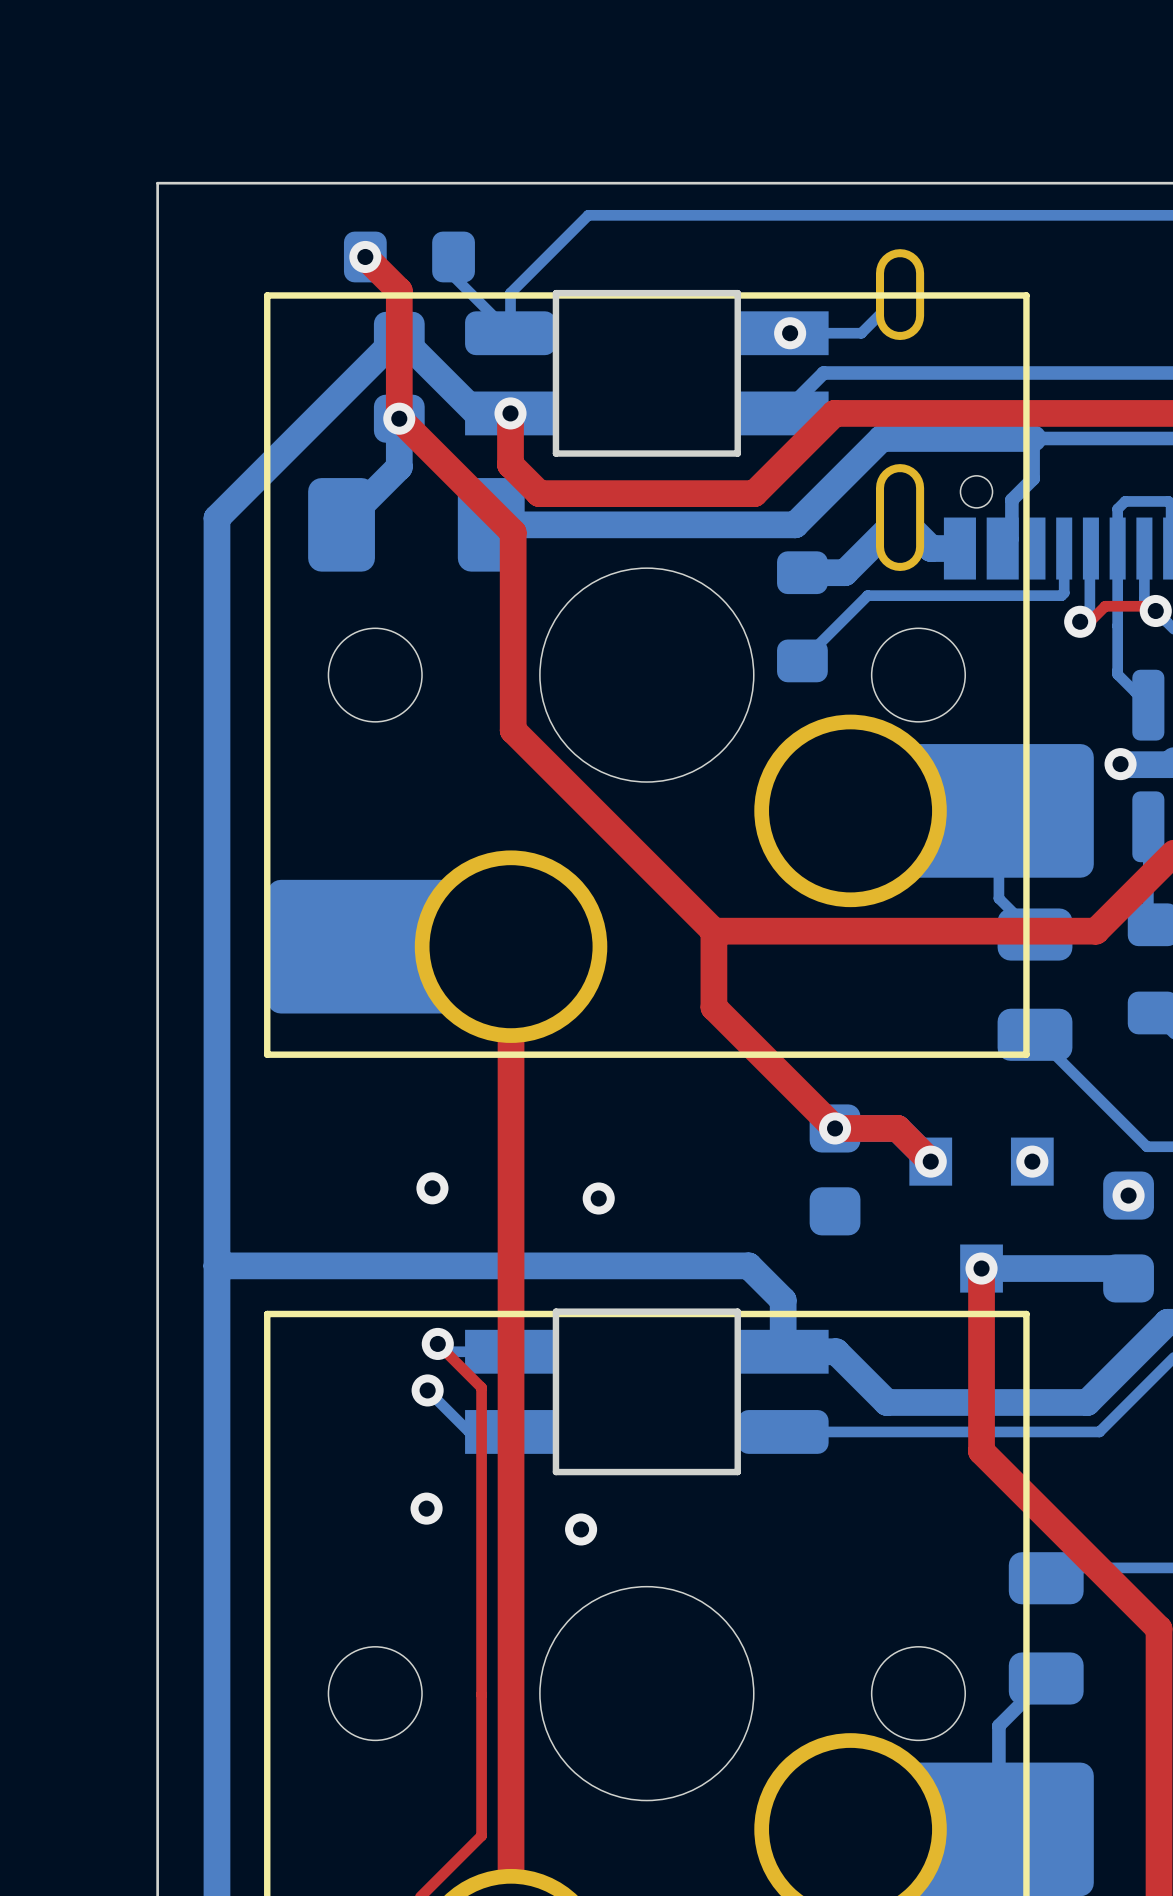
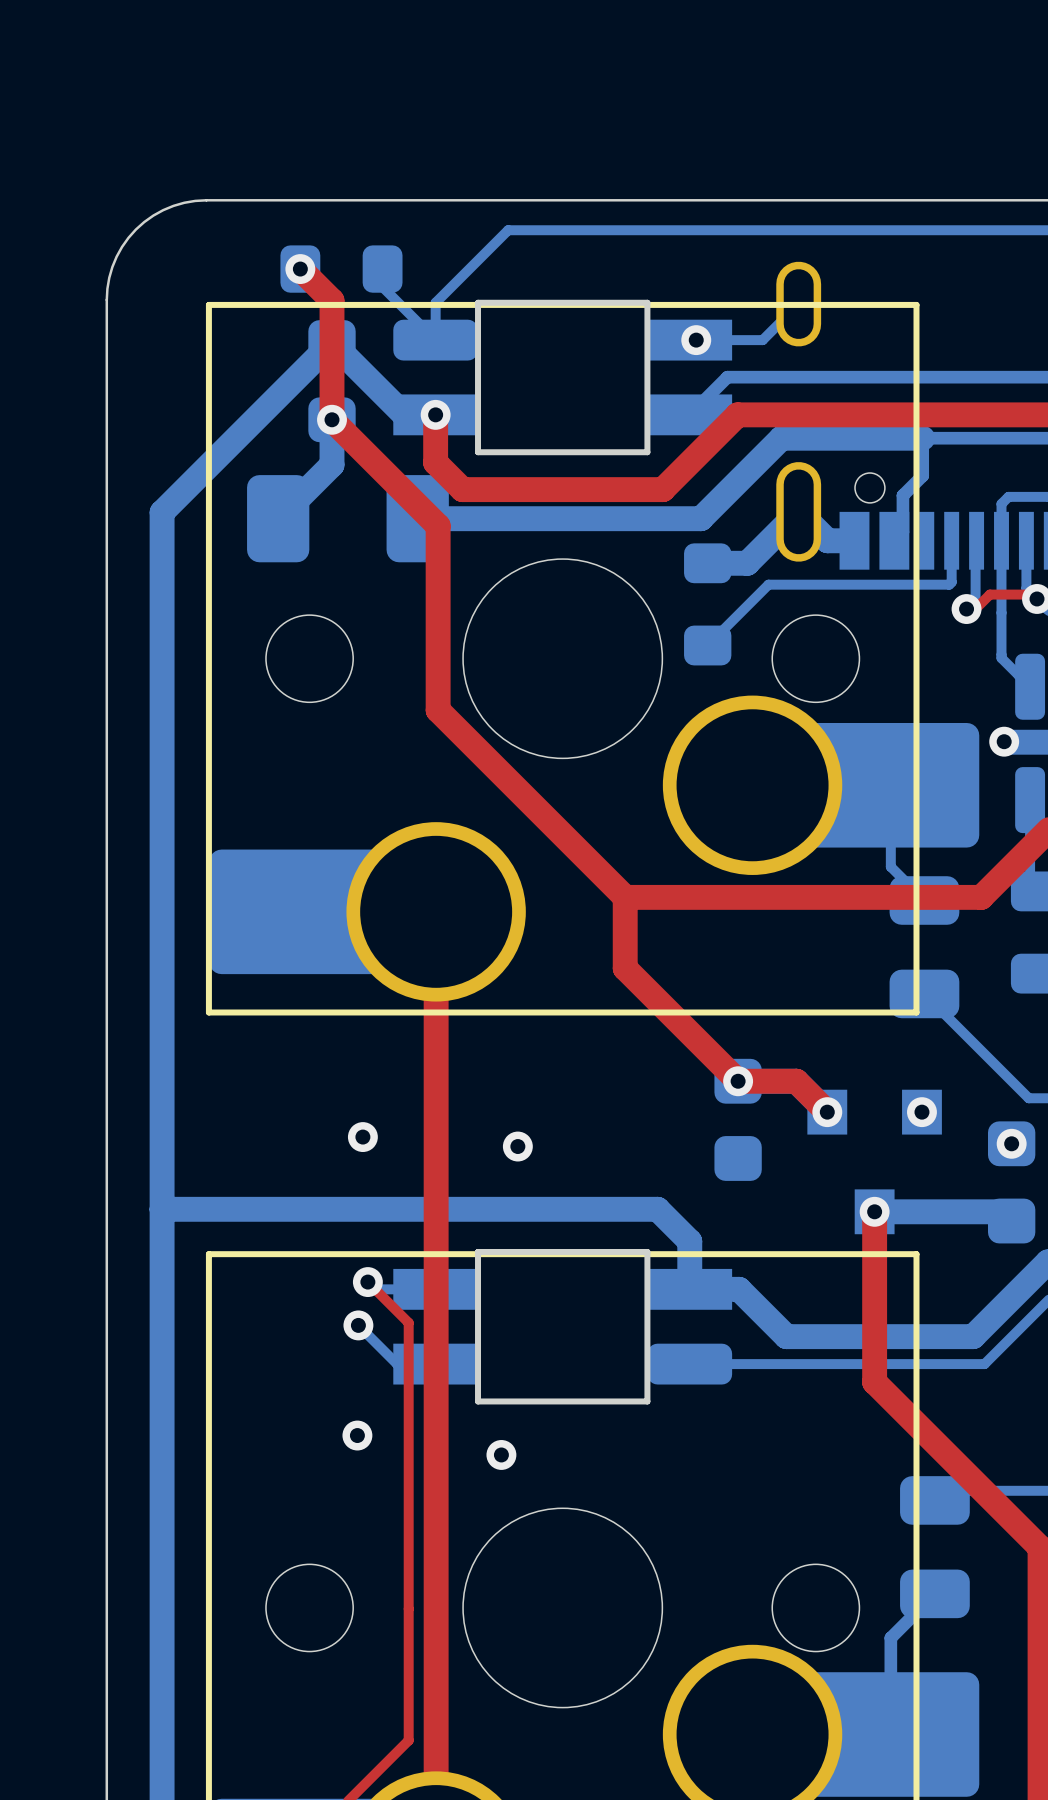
board edge: (264, 183) (157, 183) (157, 290) -> (206, 200) (173, 205) (153, 215) (135, 229) (116, 256) (109, 277) (106, 299)

